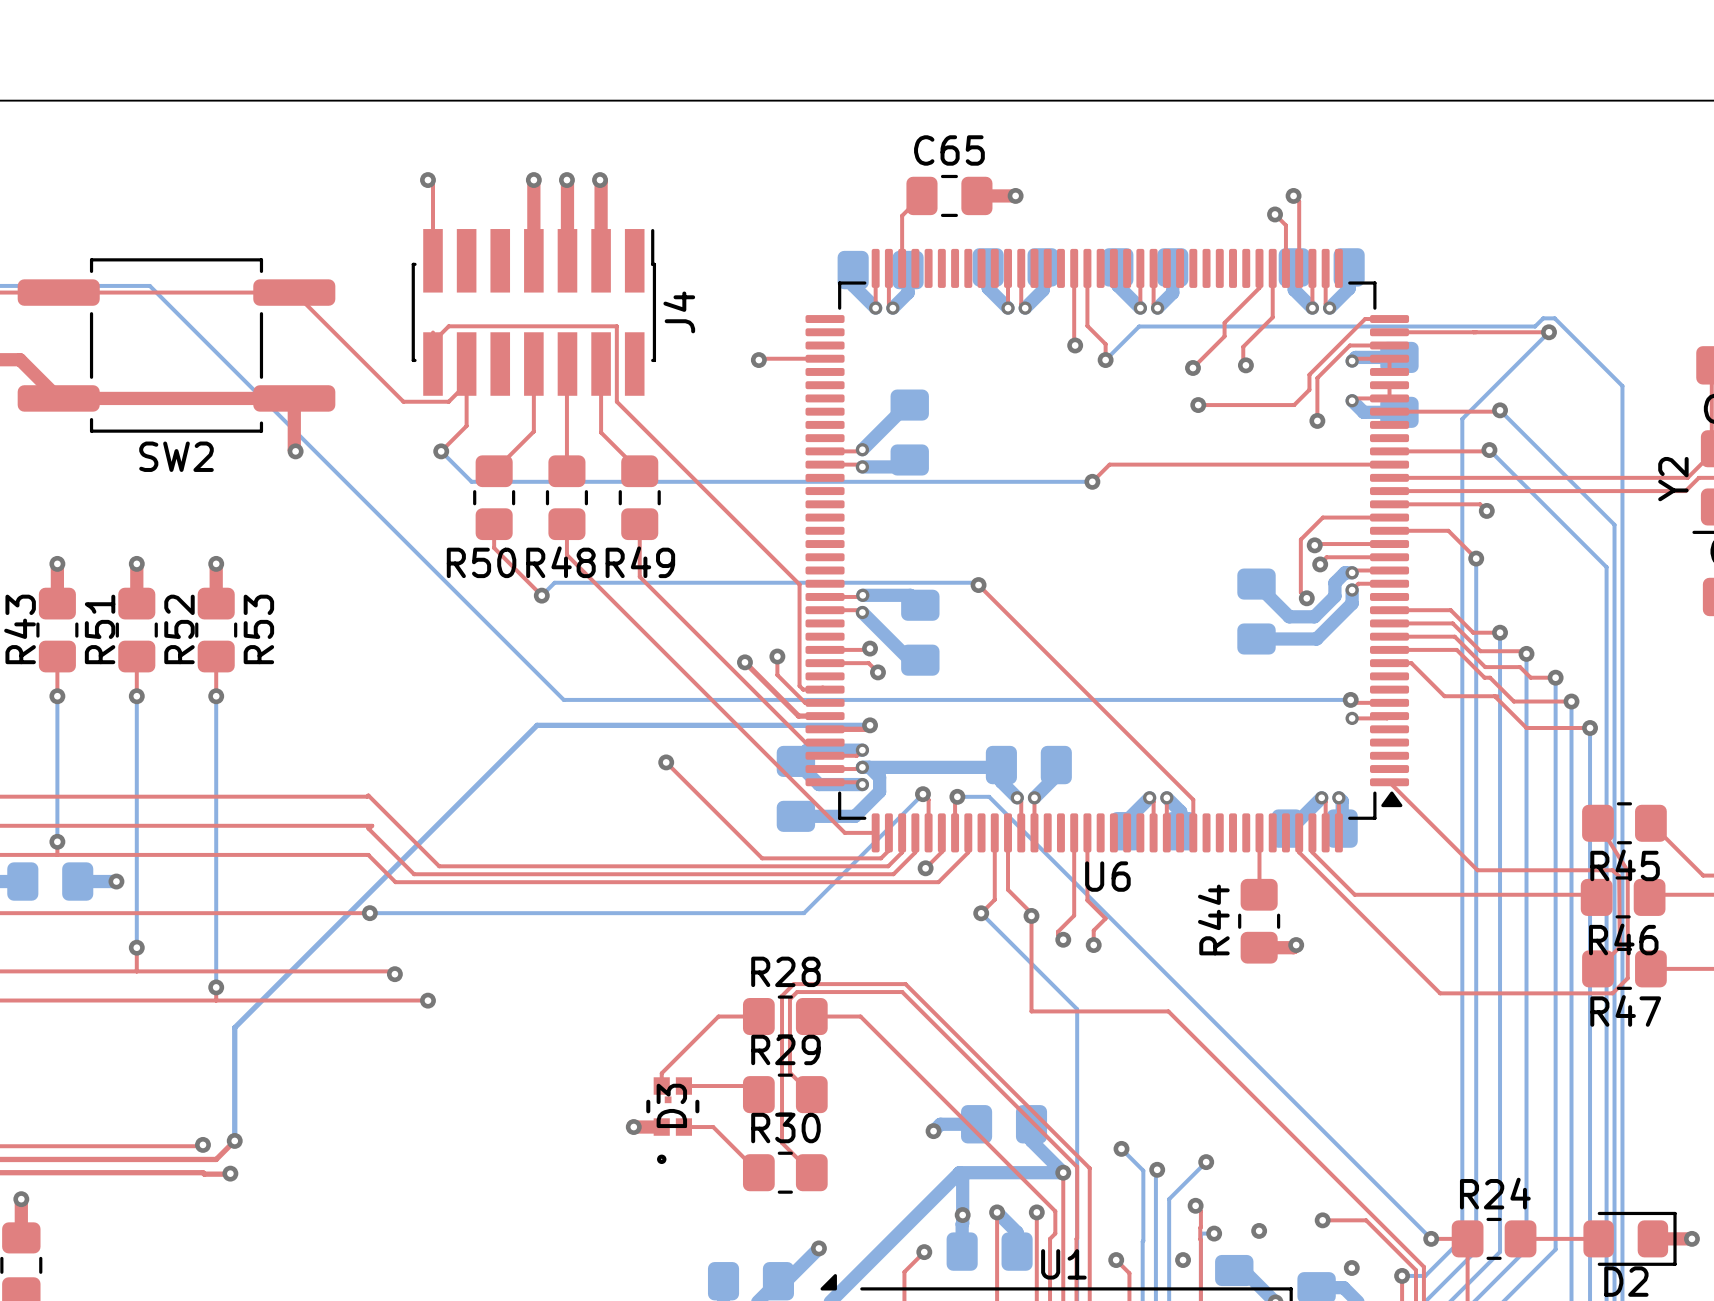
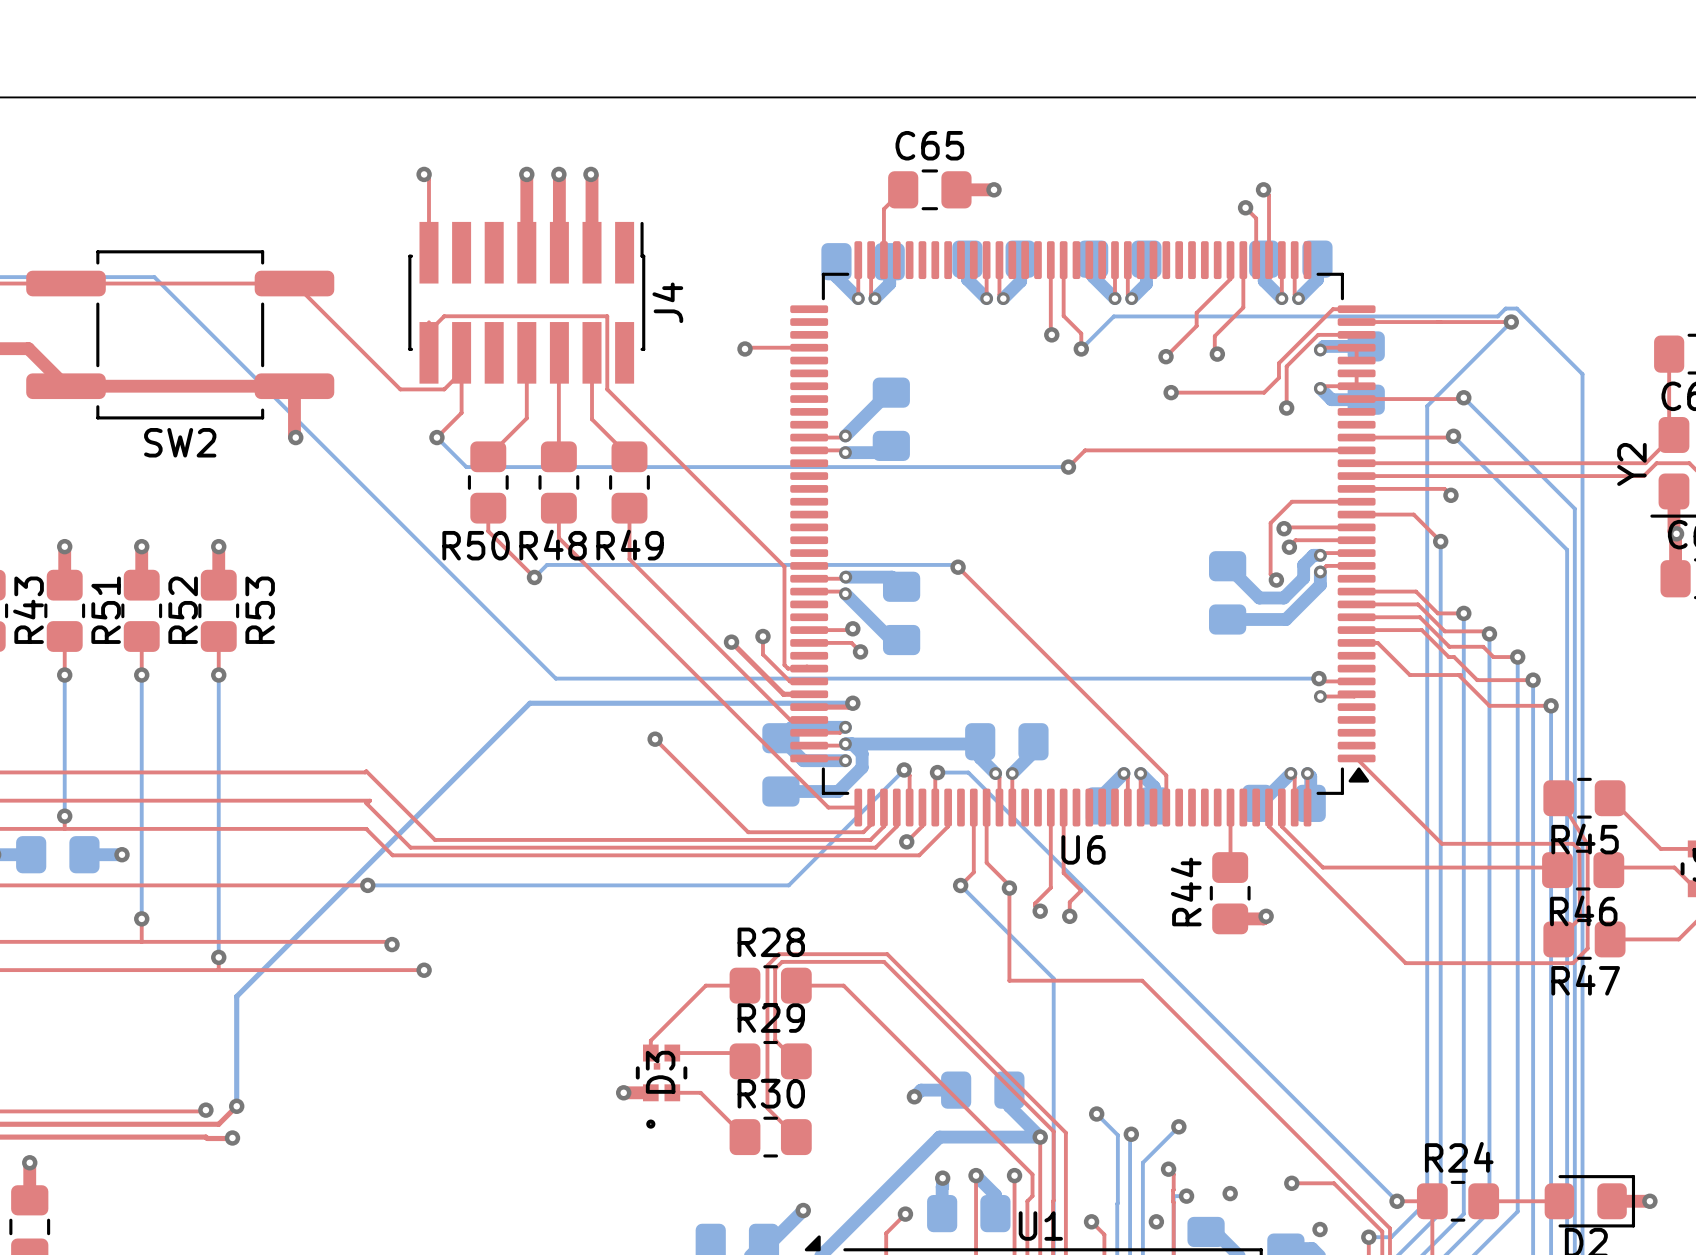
bottom track: (959, 1172) (962, 1175) (962, 1215) -> none

